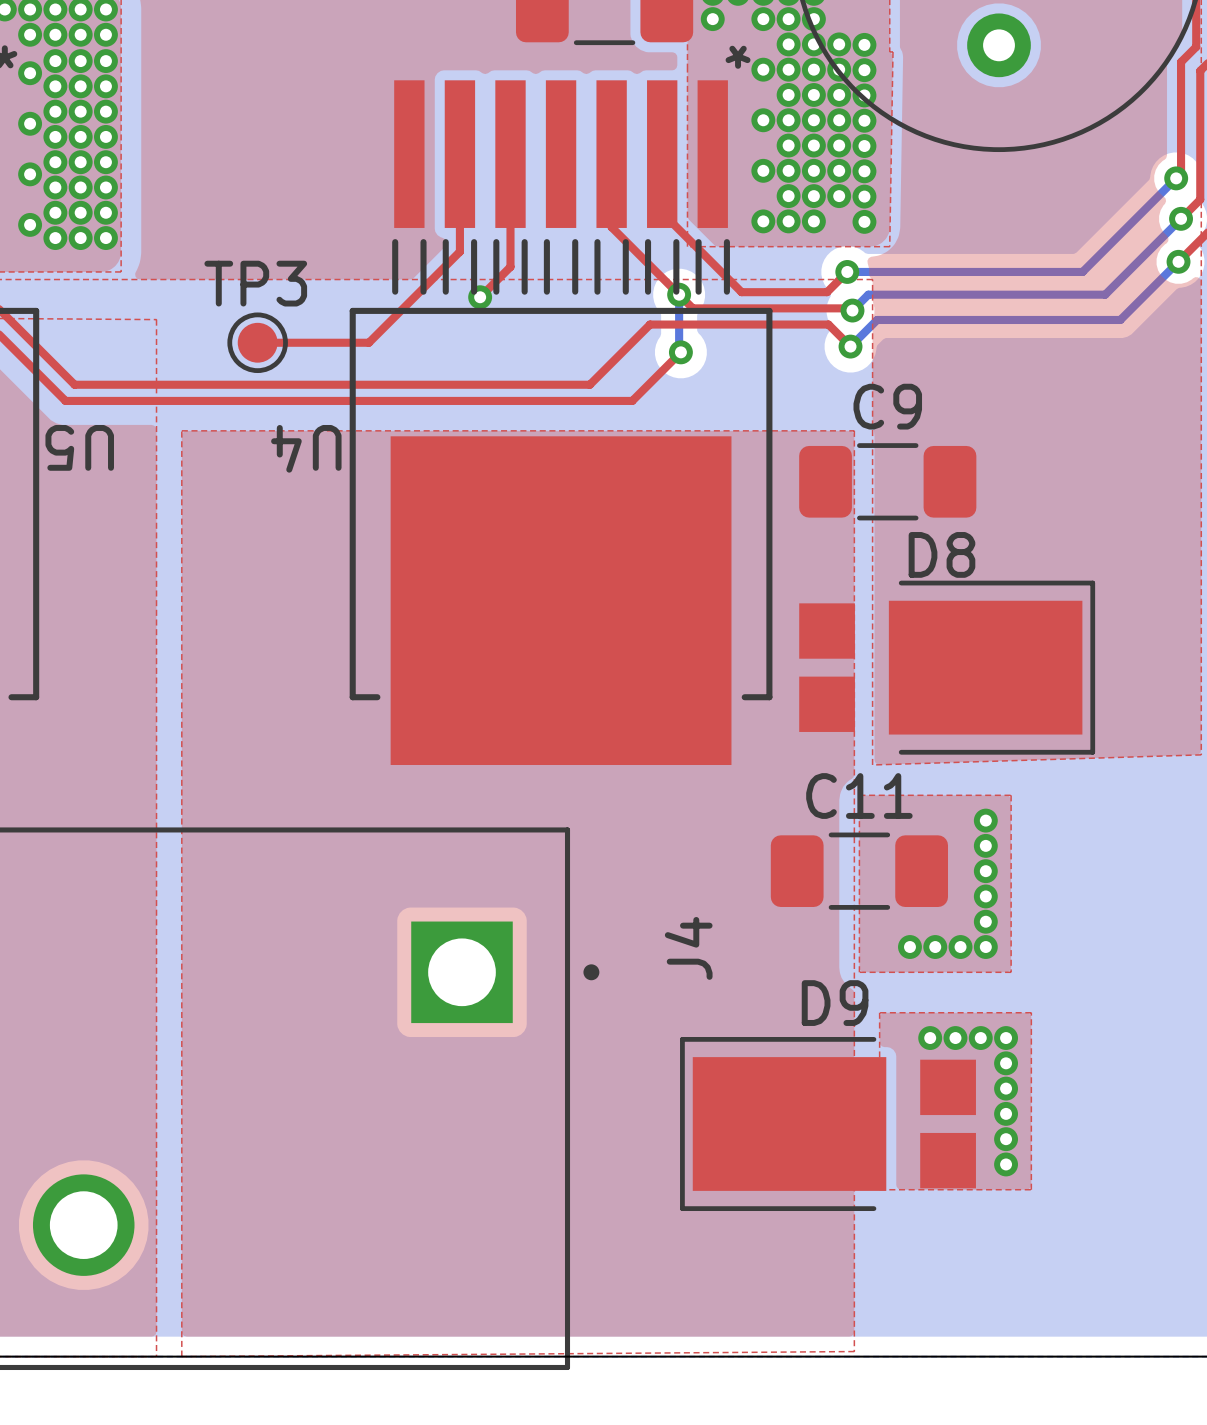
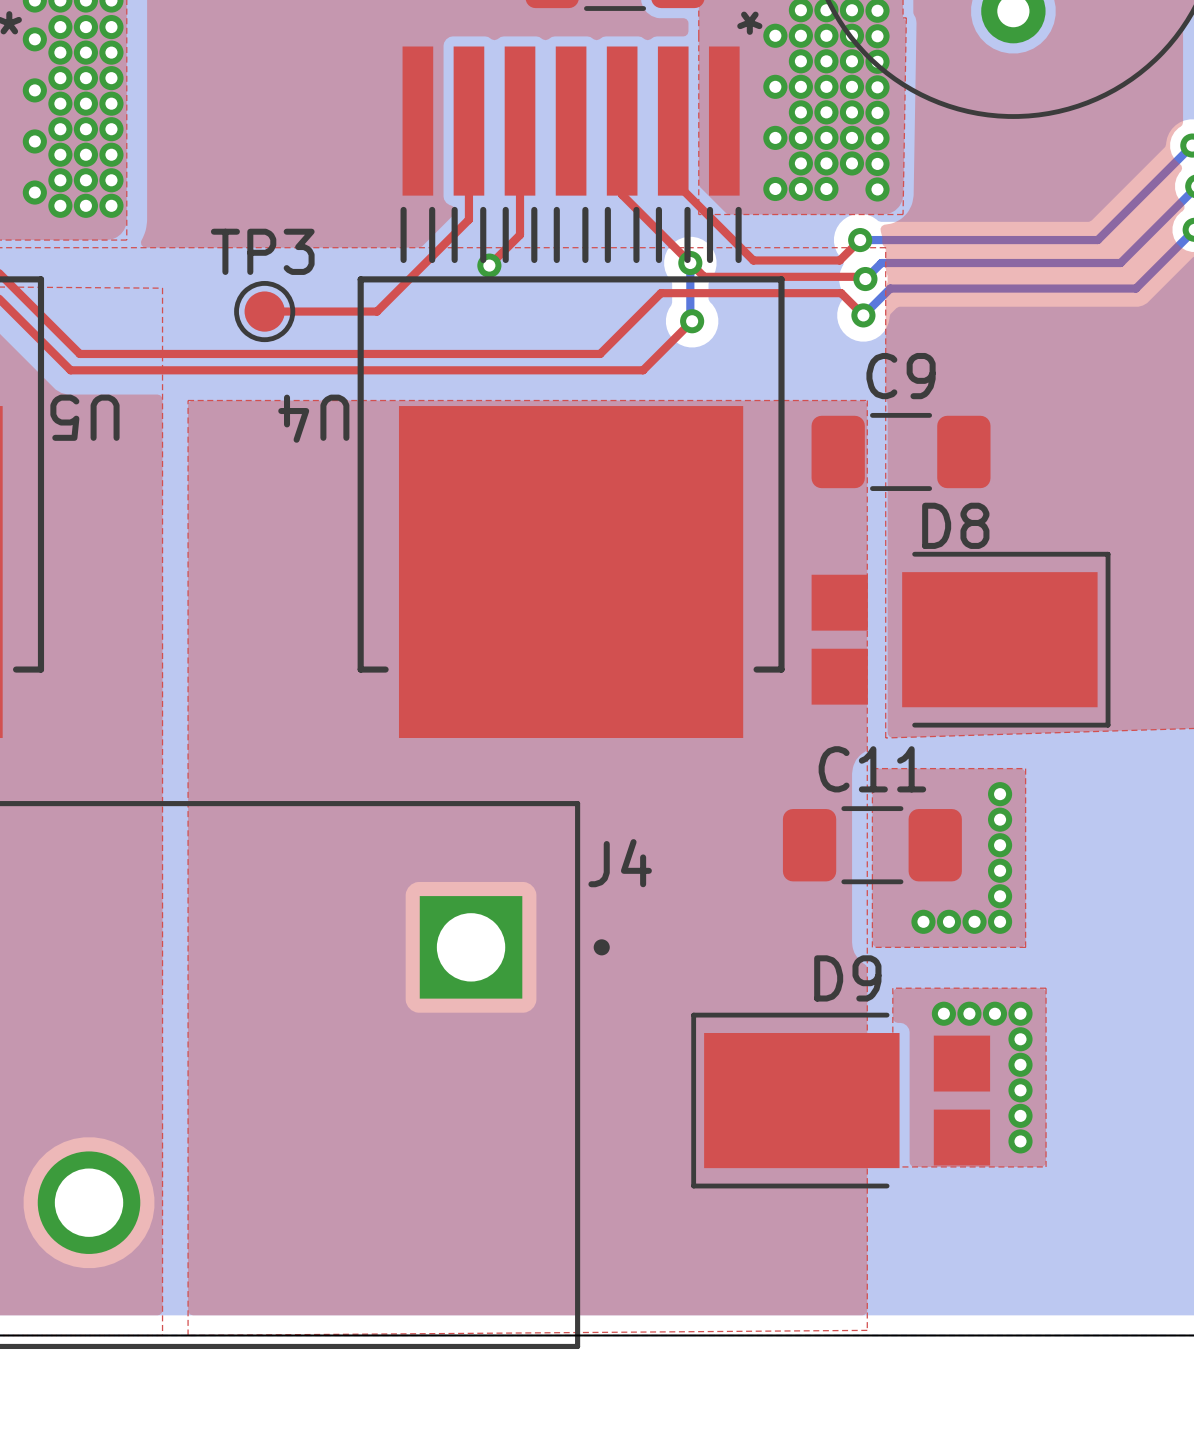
J4 name rotation: 0° (688, 948) -> 90° clockwise (620, 863)
J4 name position: J4 (688, 948) -> J4 (620, 863)

